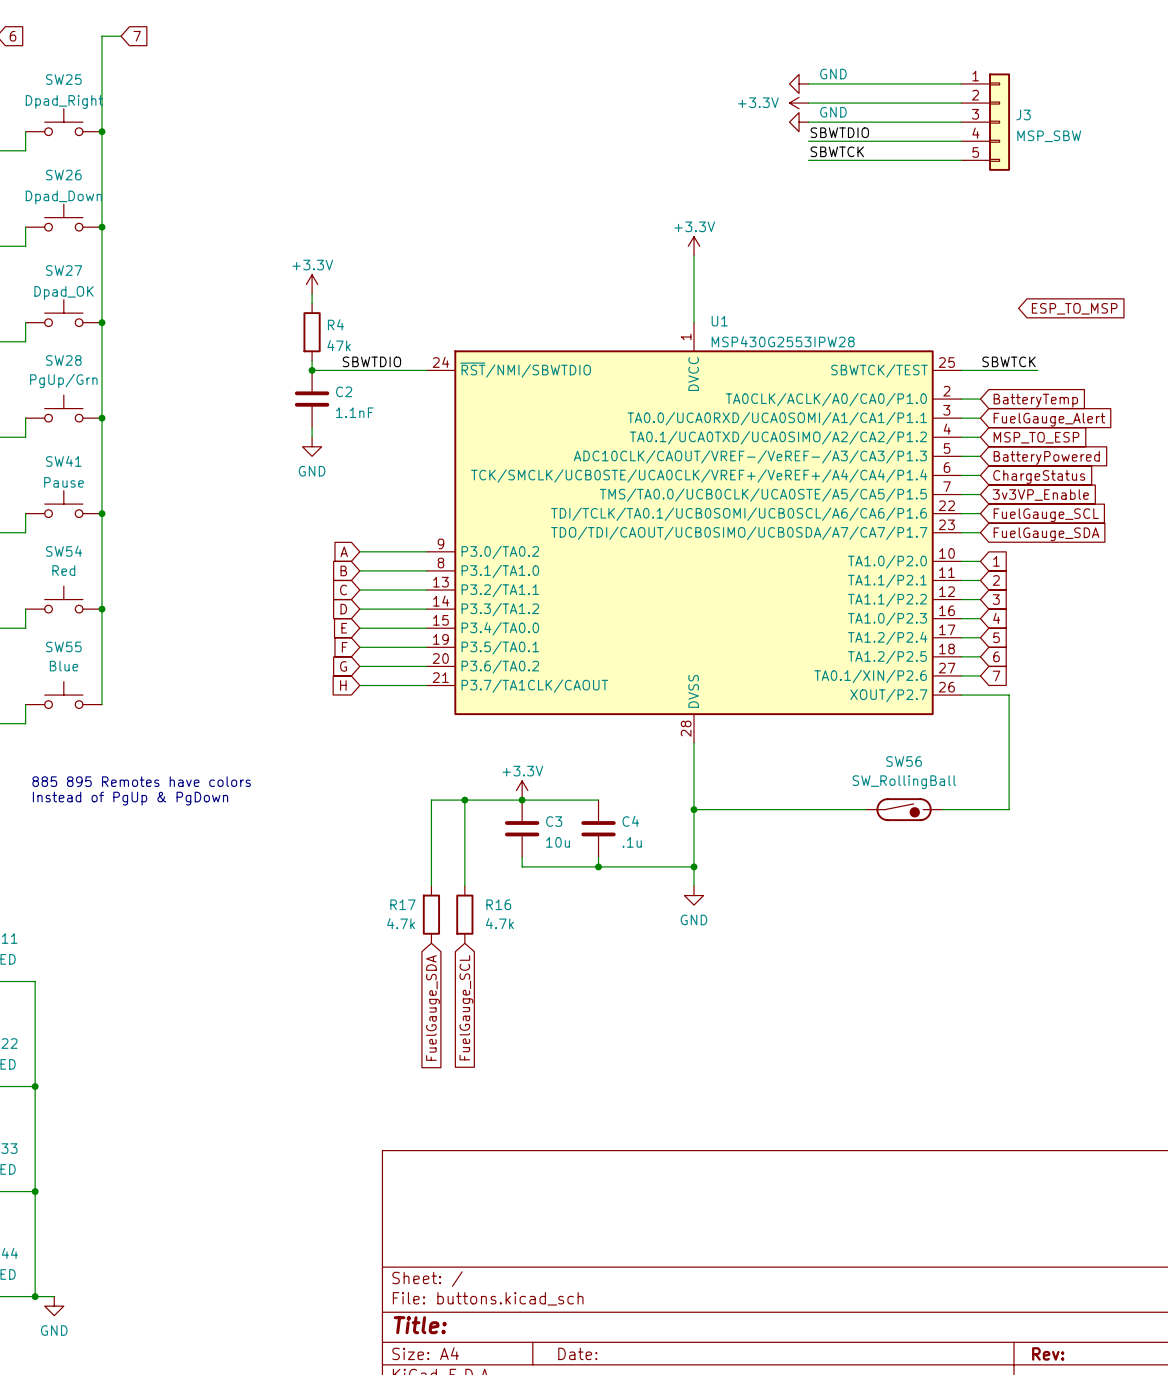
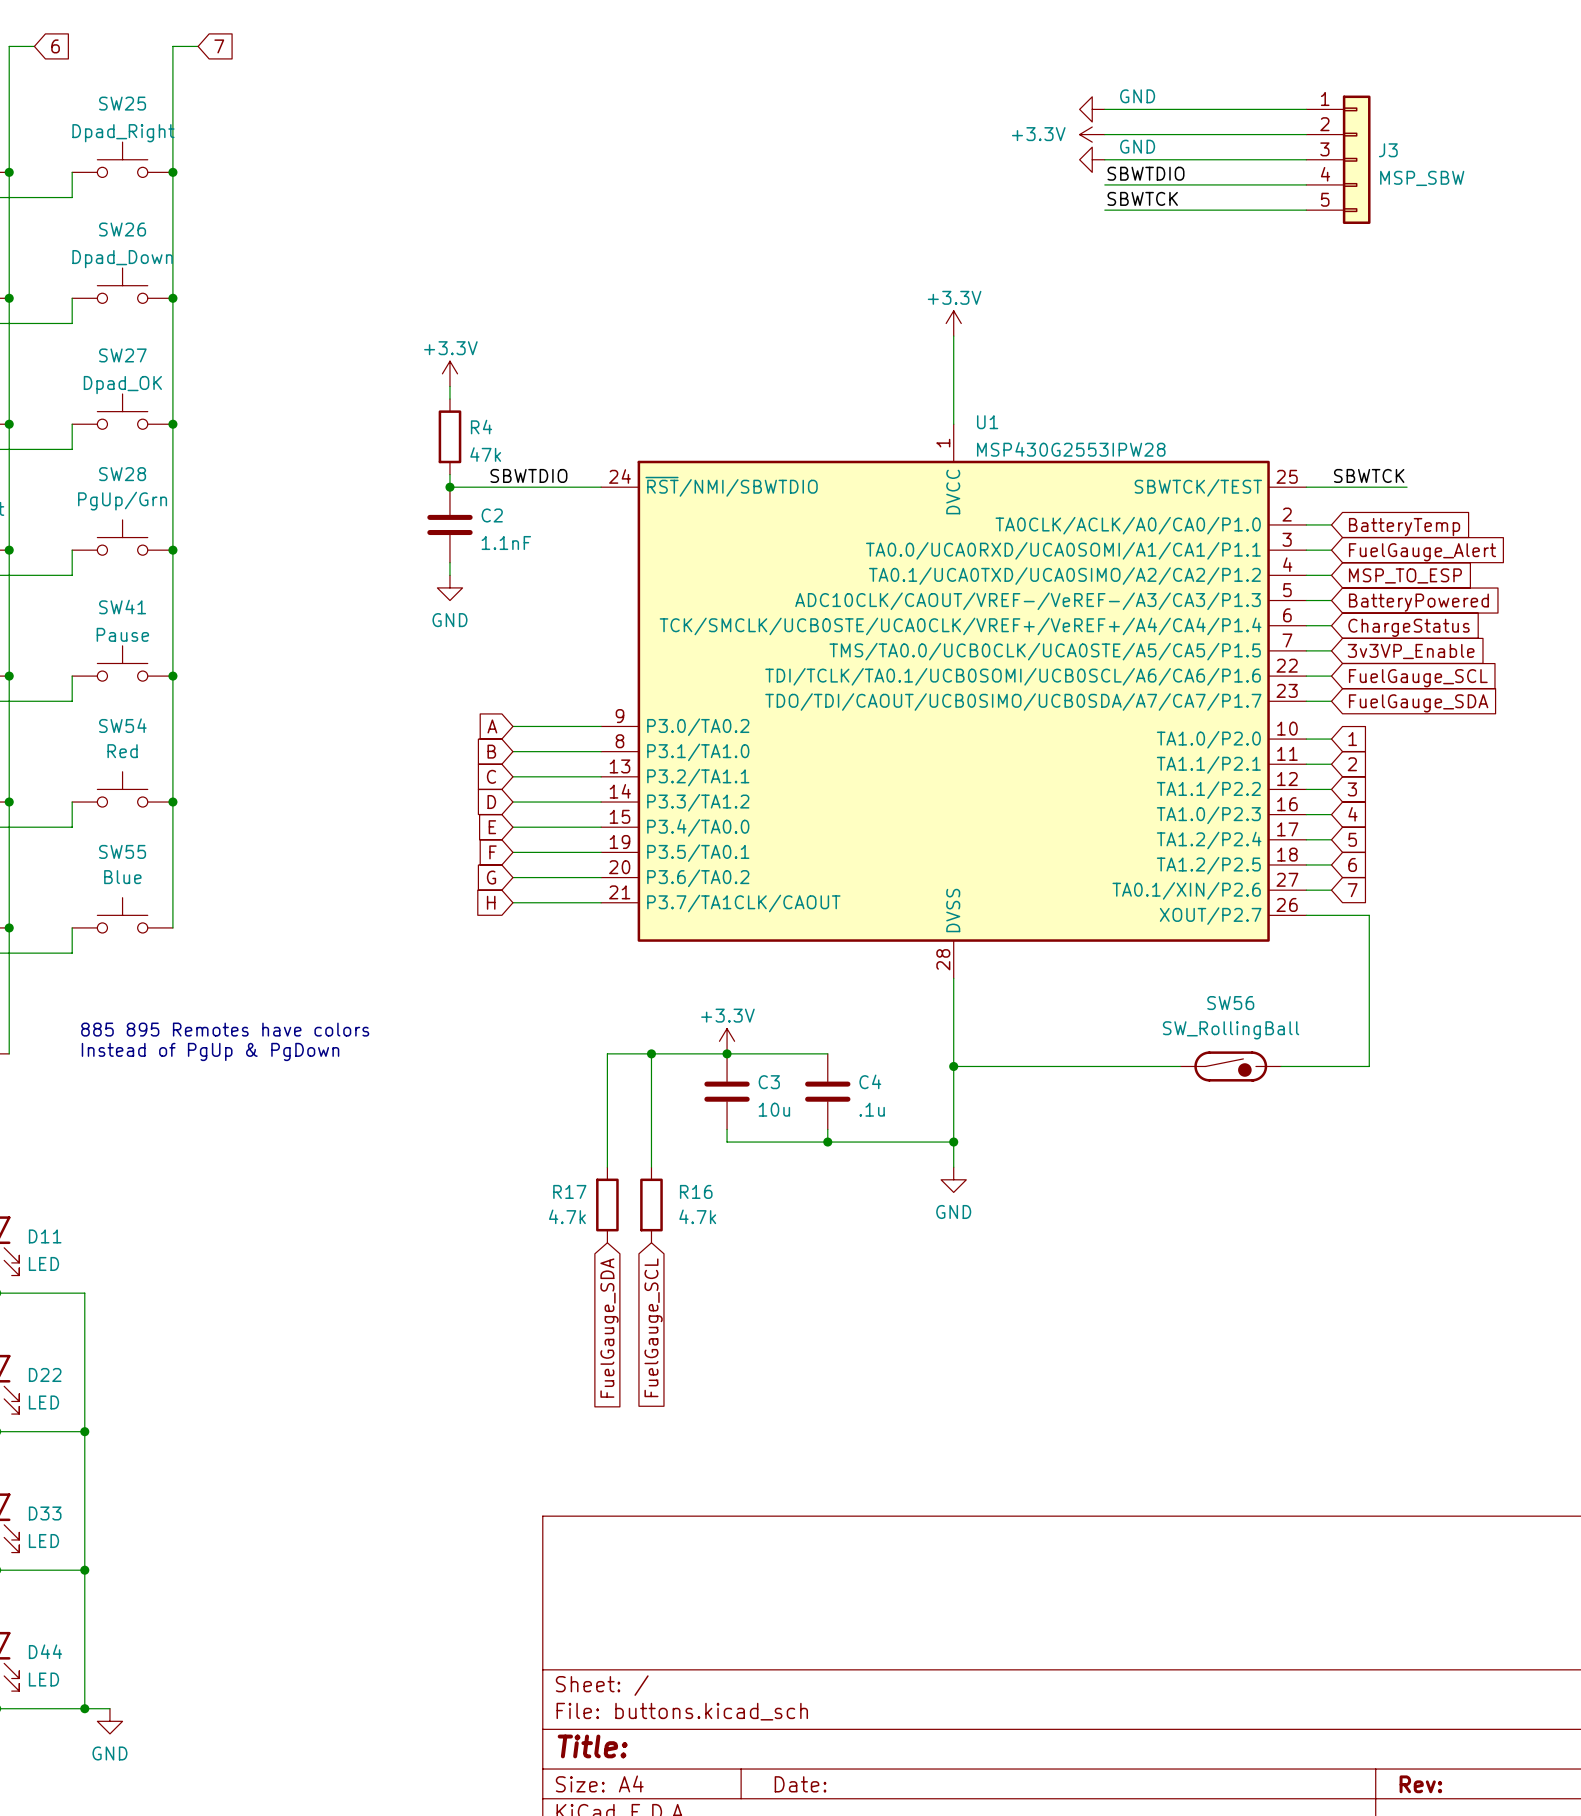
global label: ESP_TO_MSP (1074, 308) -> none

